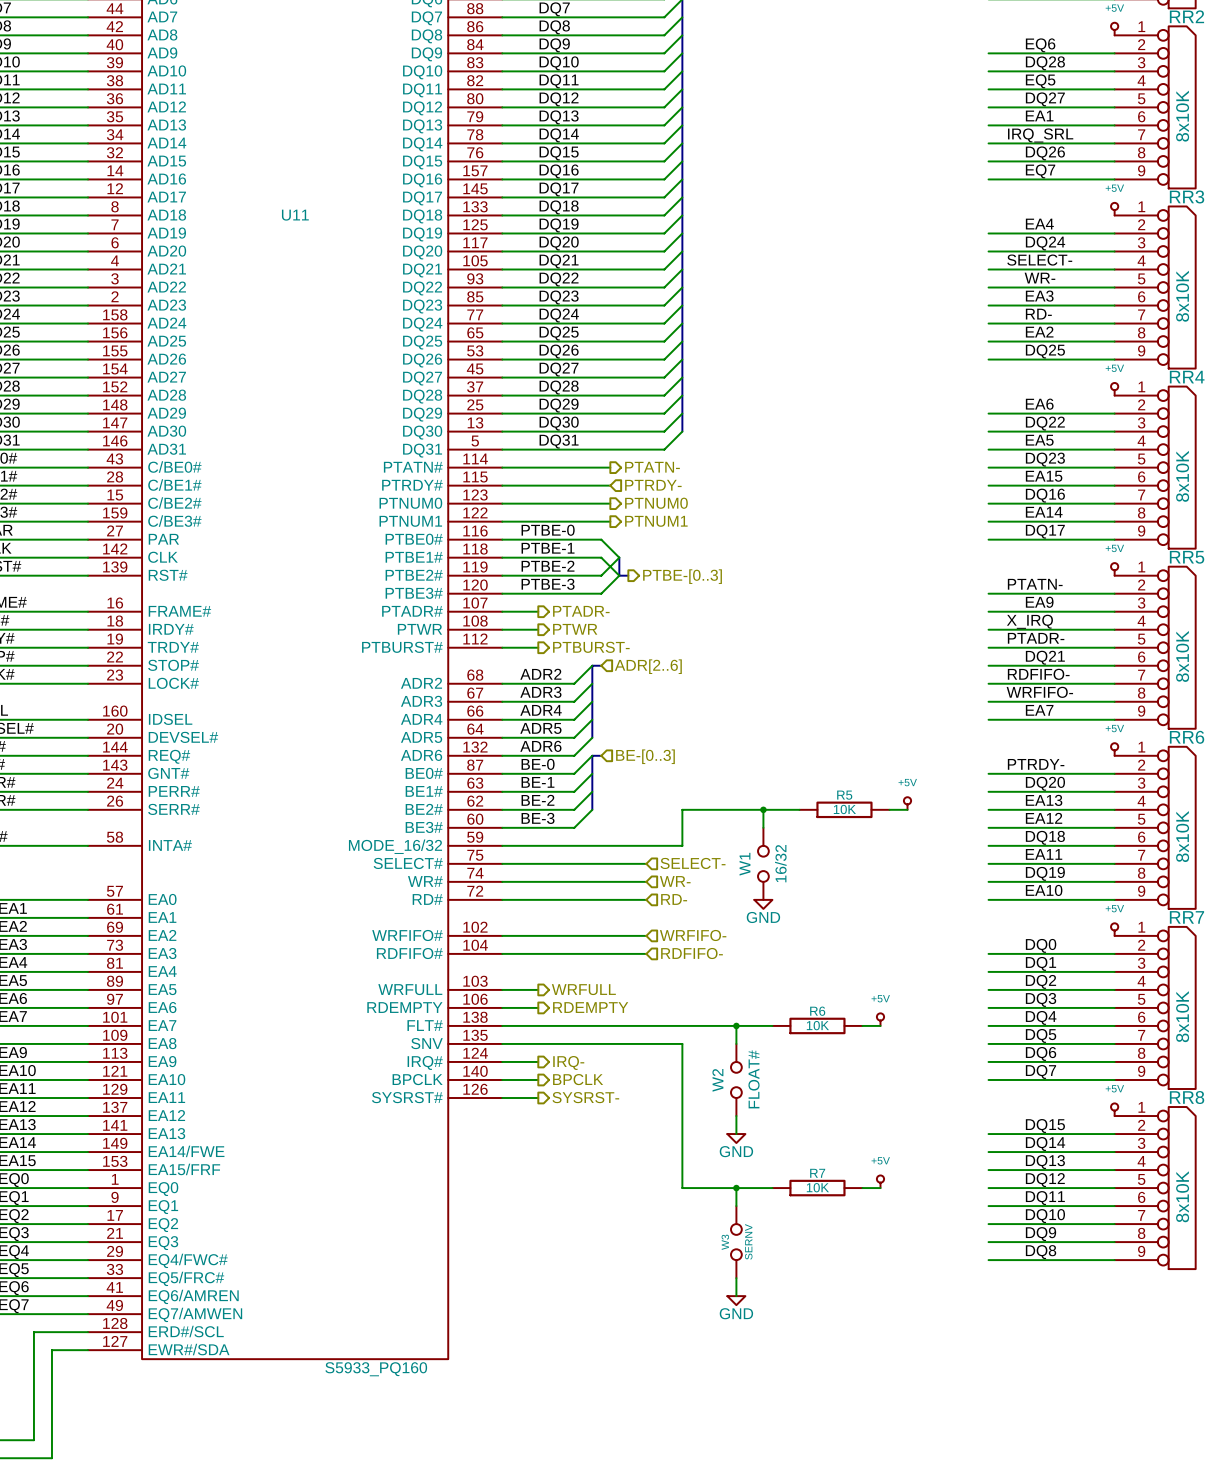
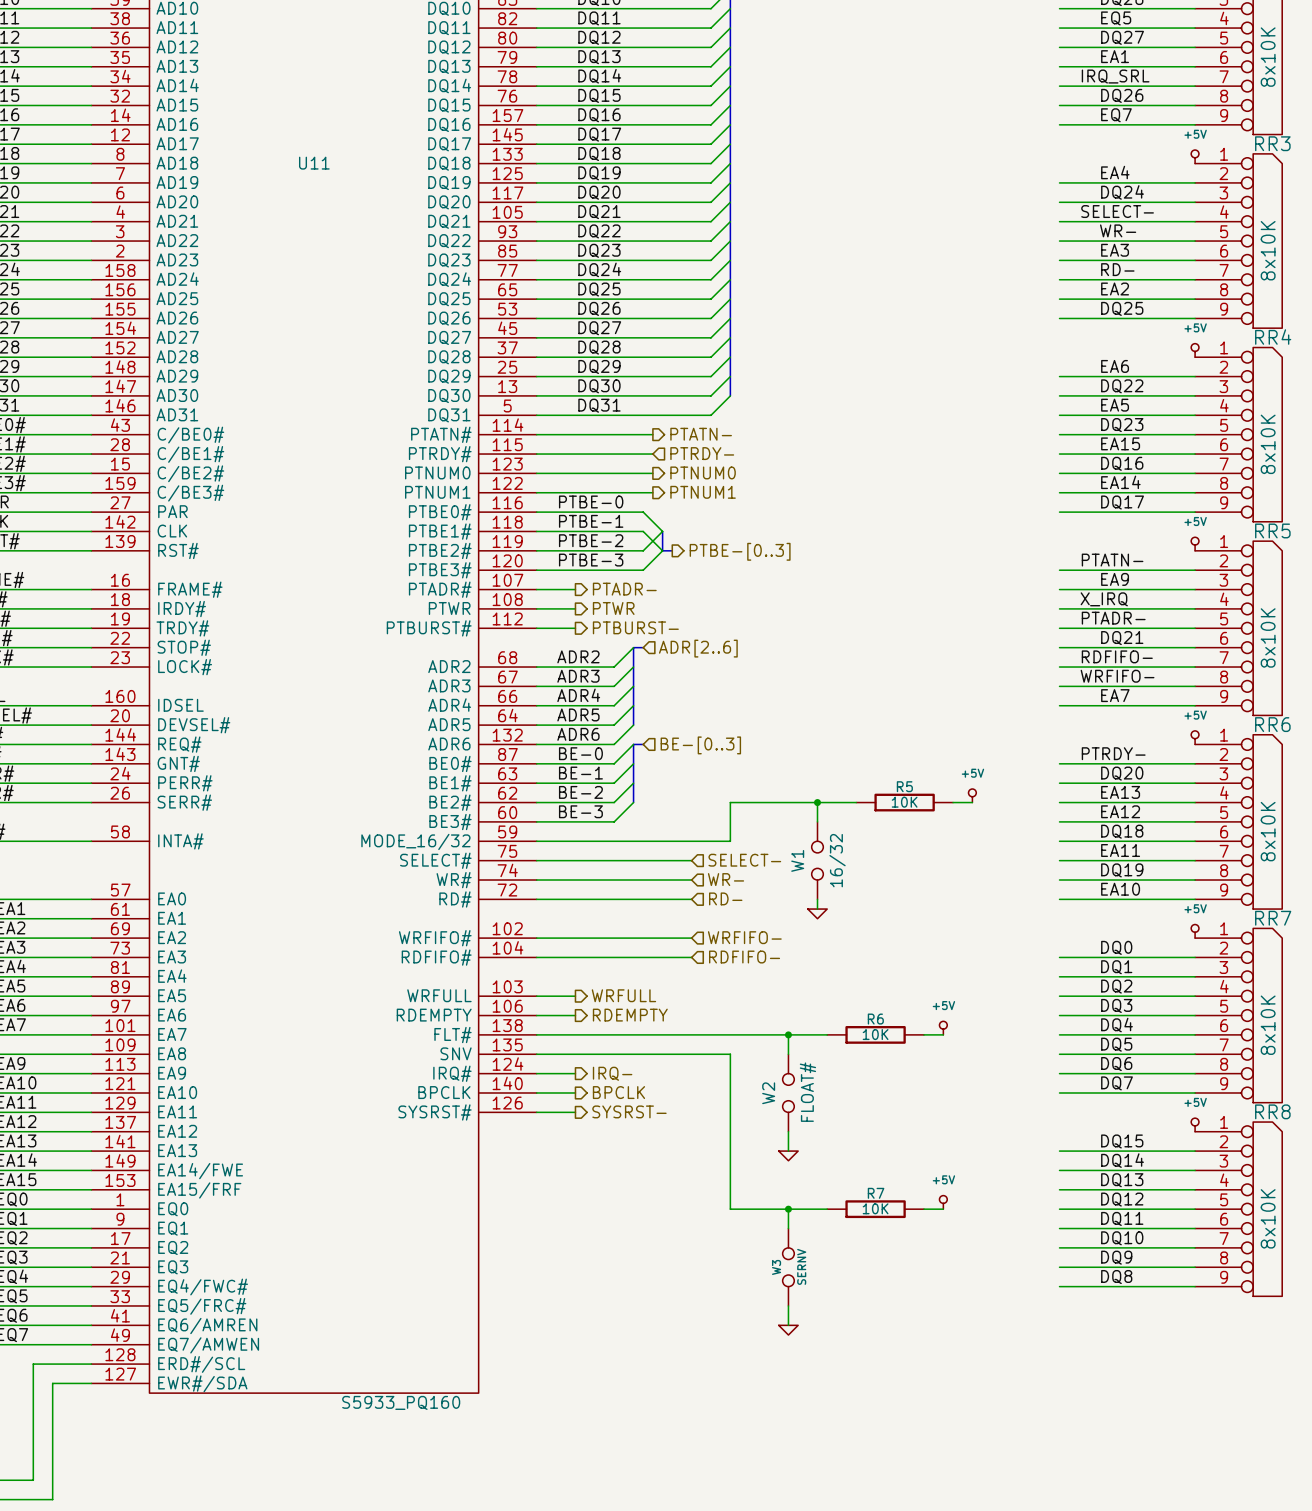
wire: none -> (817, 899) (817, 909)
power symbol: GND (763, 904) -> none
power symbol: none -> (817, 913)
power symbol text: GND (736, 1151) -> none
power symbol text: GND (736, 1313) -> none

